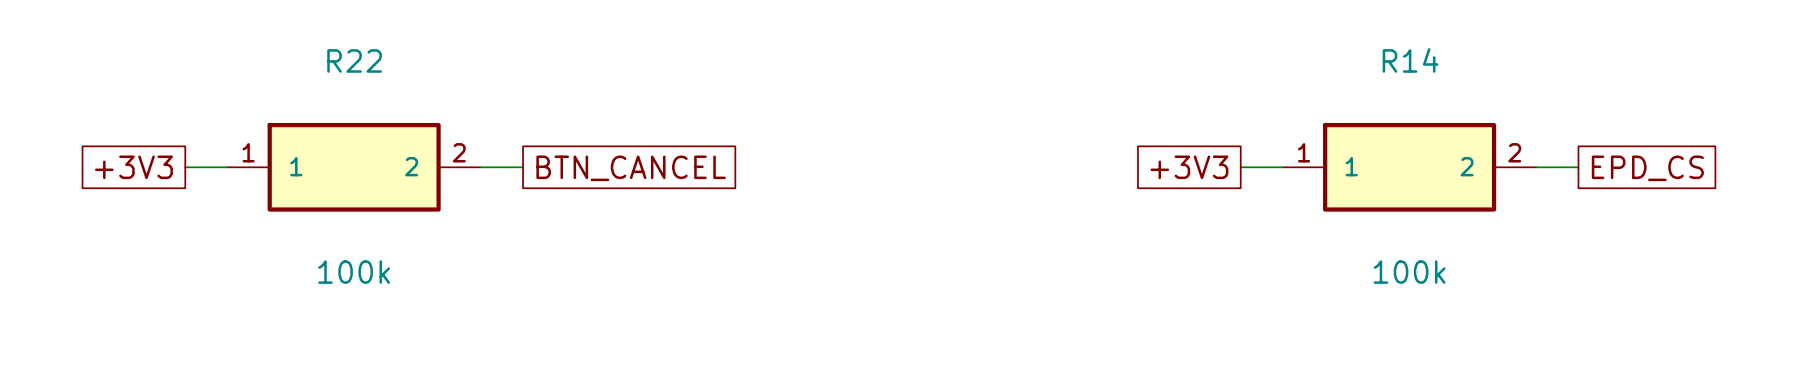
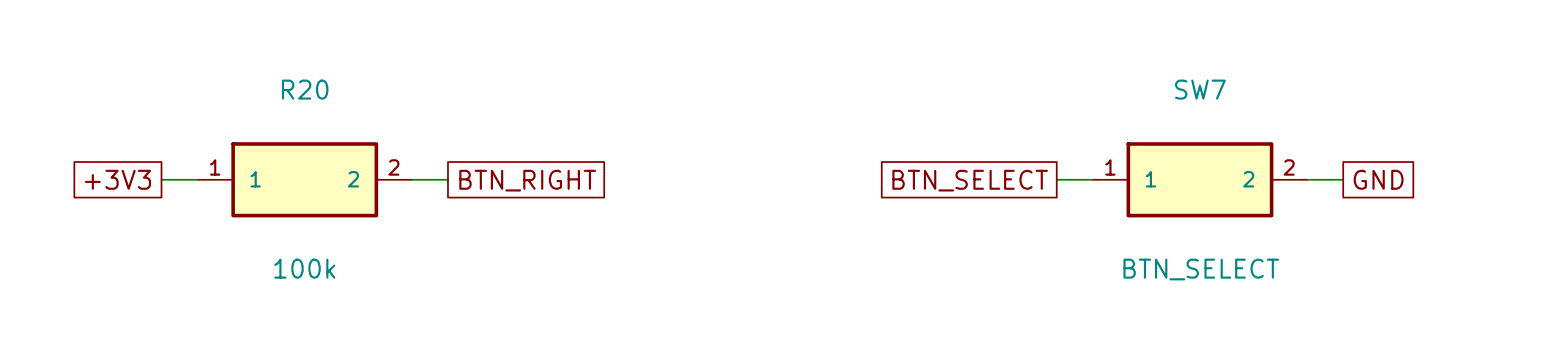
R22 name: R22 (354, 60) -> R20 (305, 89)
R14 name: R14 (1410, 60) -> SW7 (1200, 89)
global label: +3V3 (1189, 167) -> BTN_SELECT (970, 180)
global label: BTN_CANCEL (631, 168) -> BTN_RIGHT (527, 180)
global label: EPD_CS (1647, 168) -> GND (1378, 179)
R14 value: 100k (1409, 272) -> BTN_SELECT (1201, 269)

